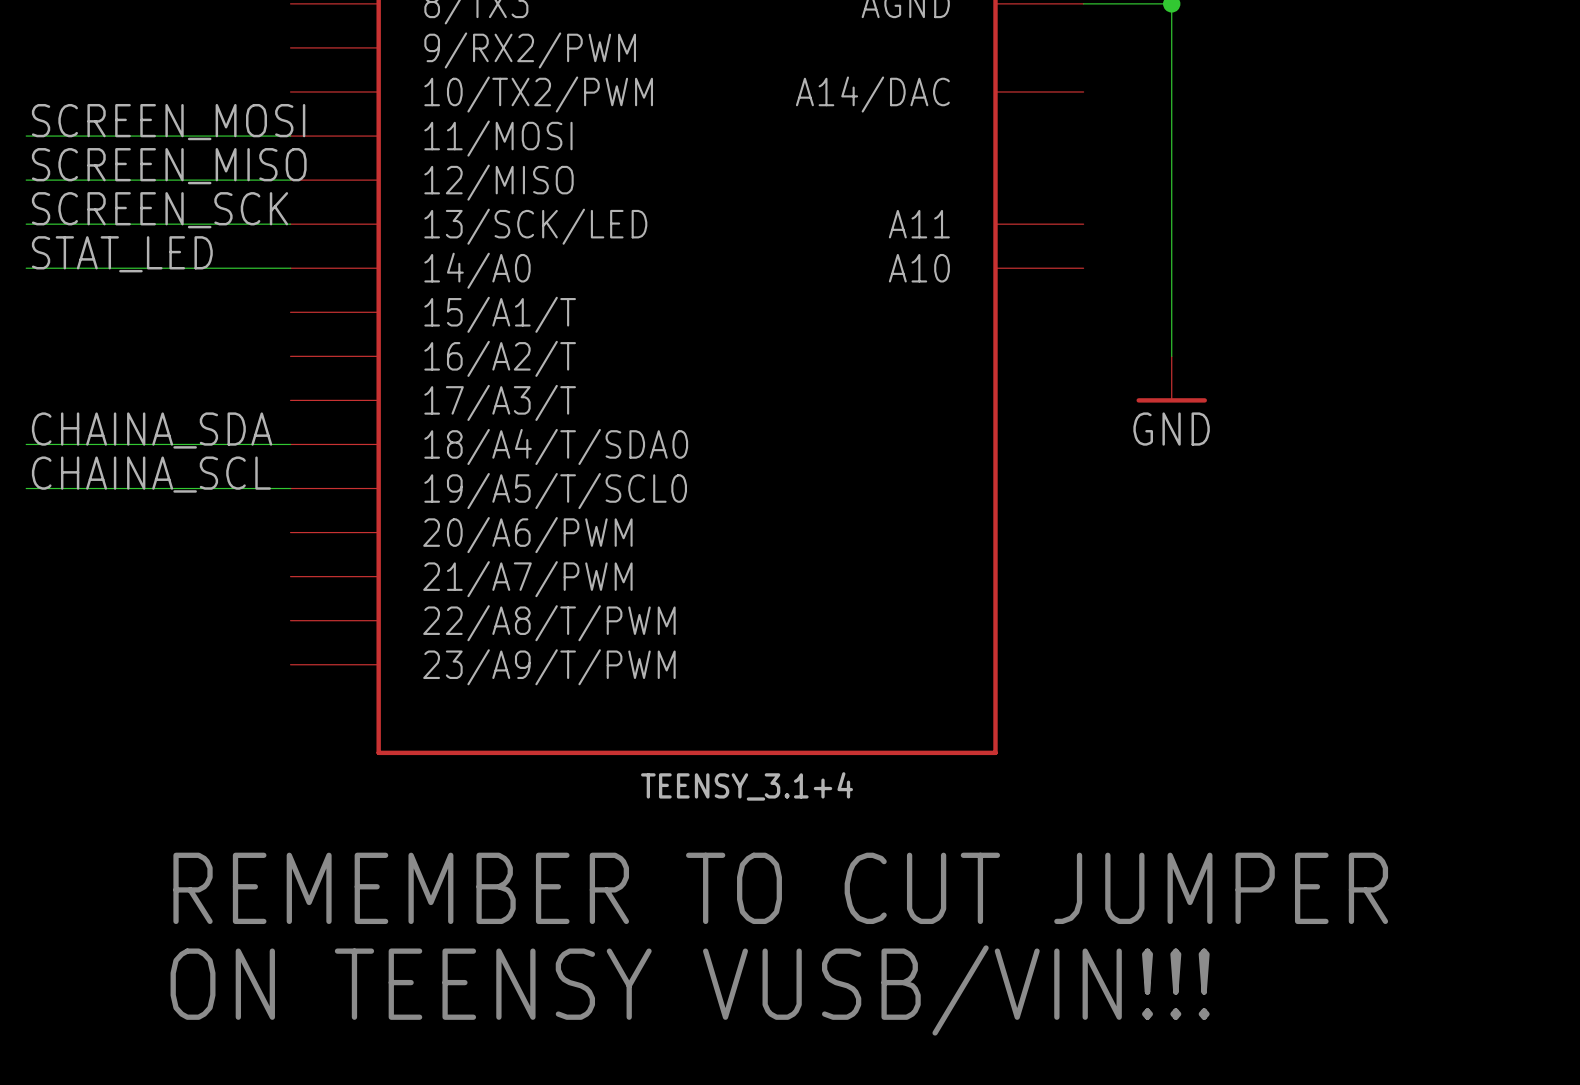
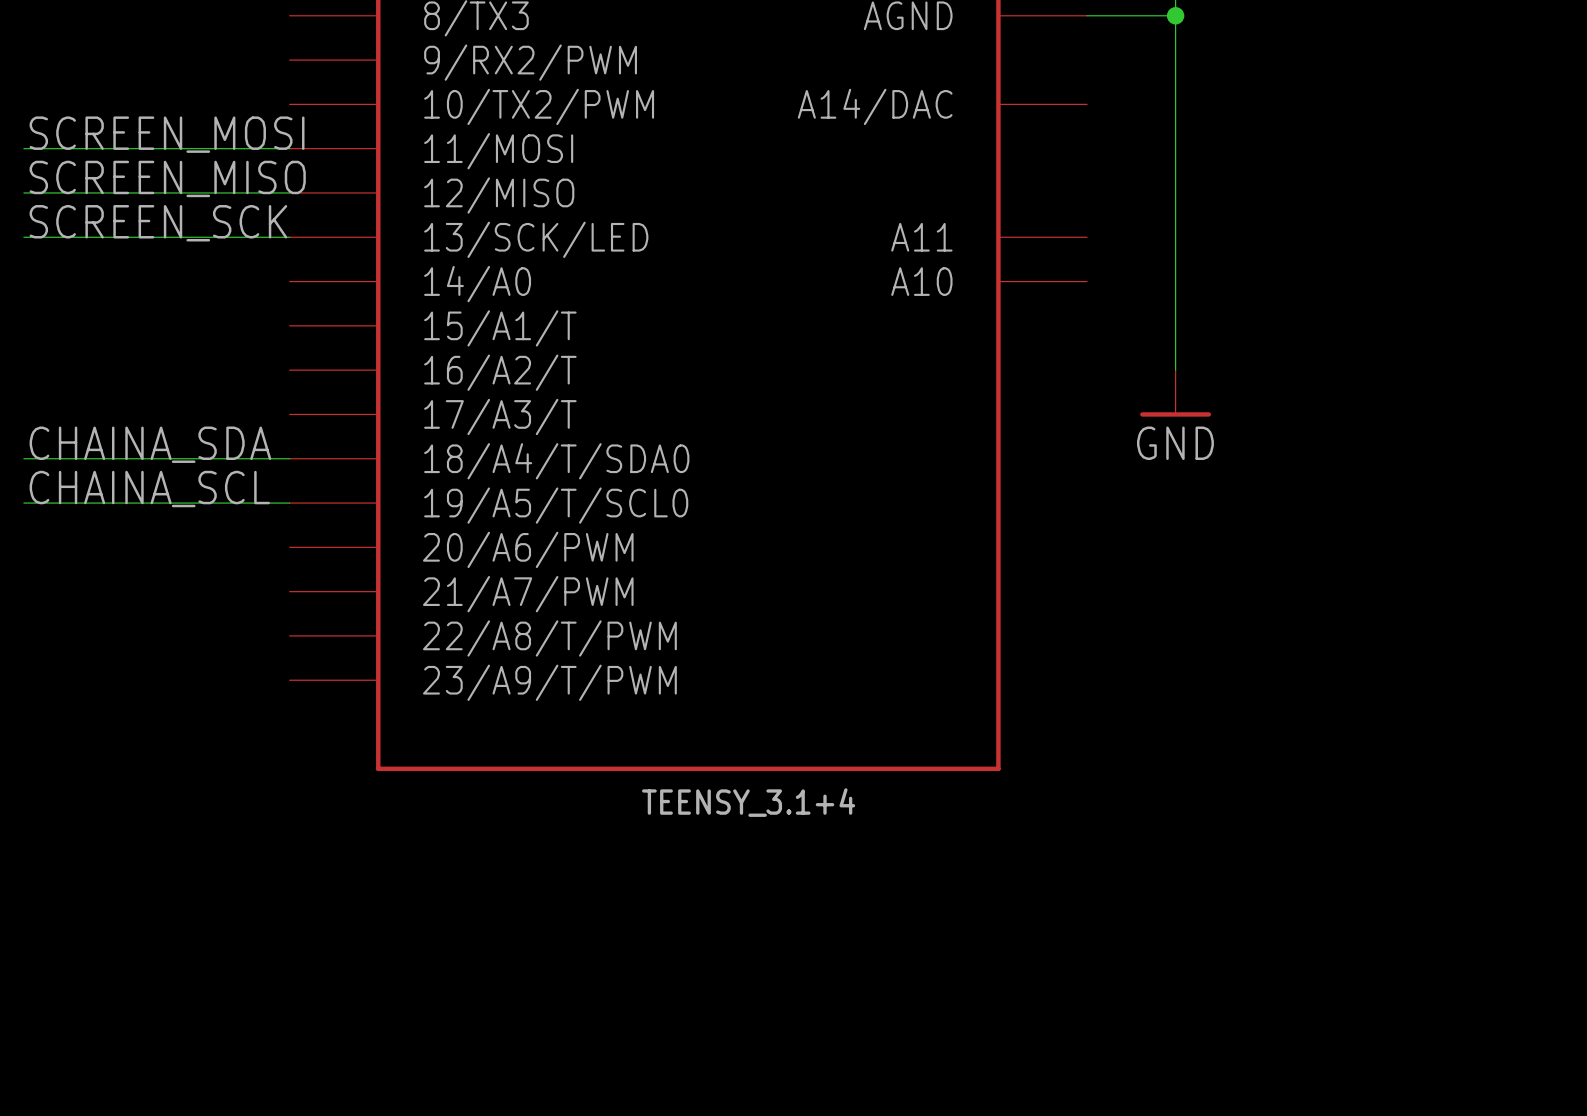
label: STAT_LED (122, 254) -> none
wire: (26, 268) (290, 268) -> none
text: REMEMBER TO CUT JUMPER (780, 888) -> none
text: ON TEENSY VUSB/VIN!!! (690, 990) -> none

